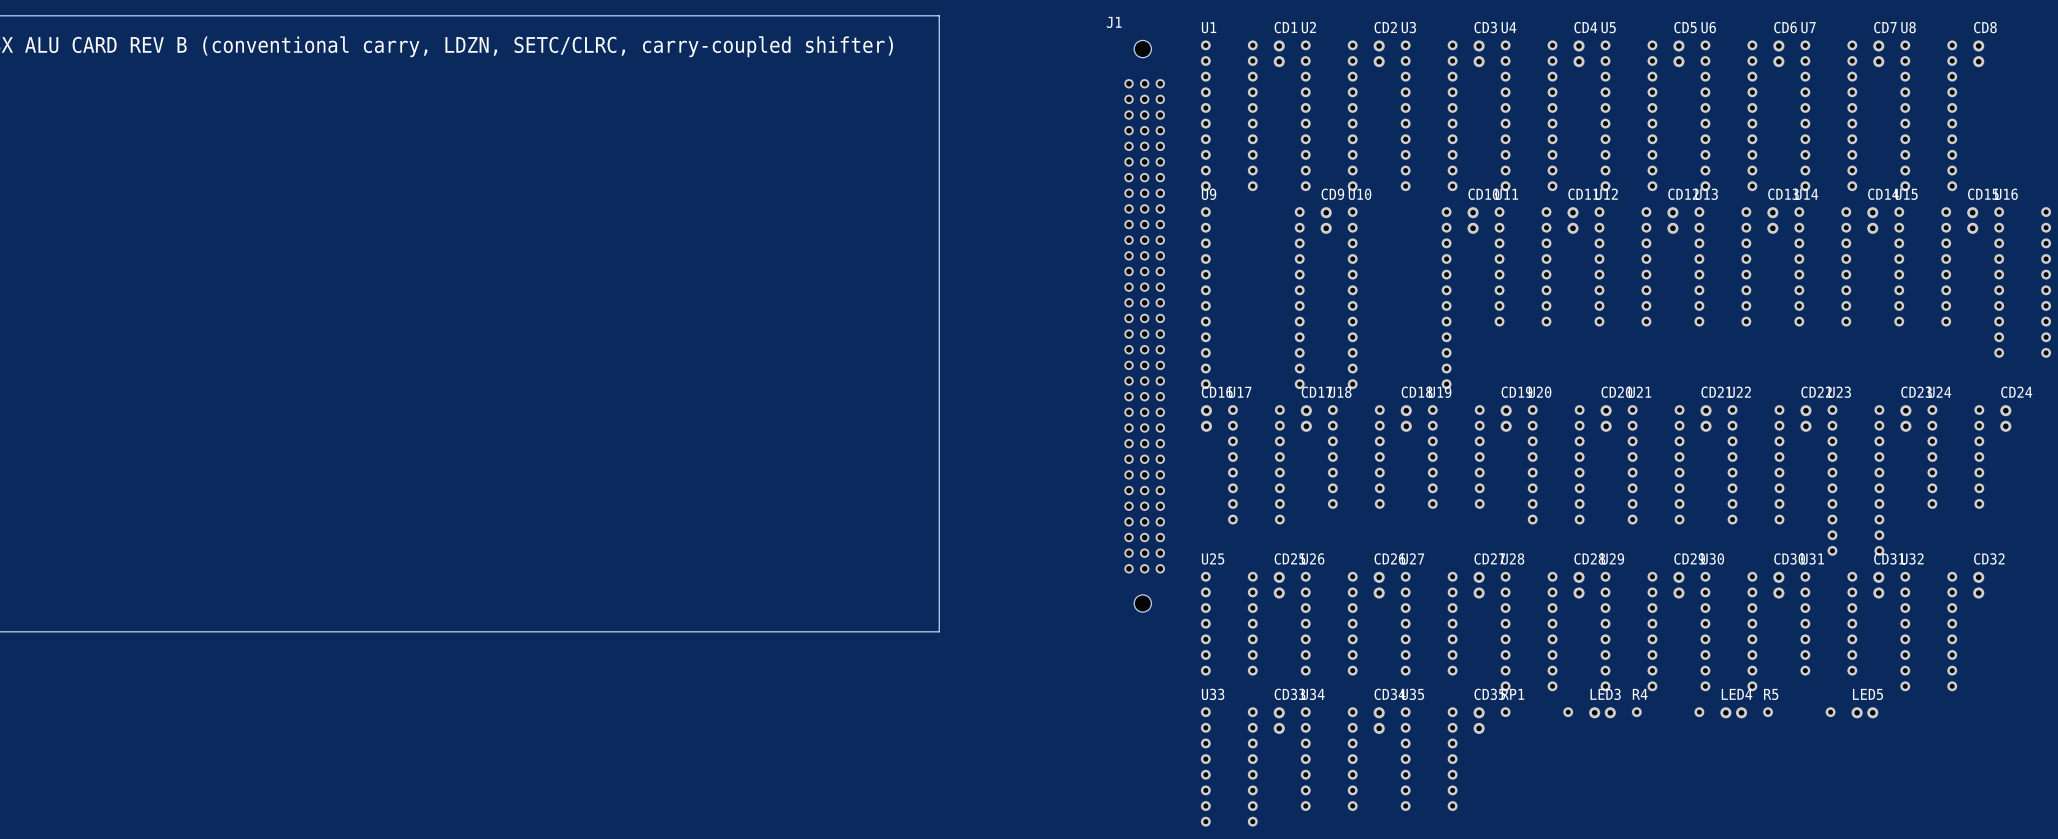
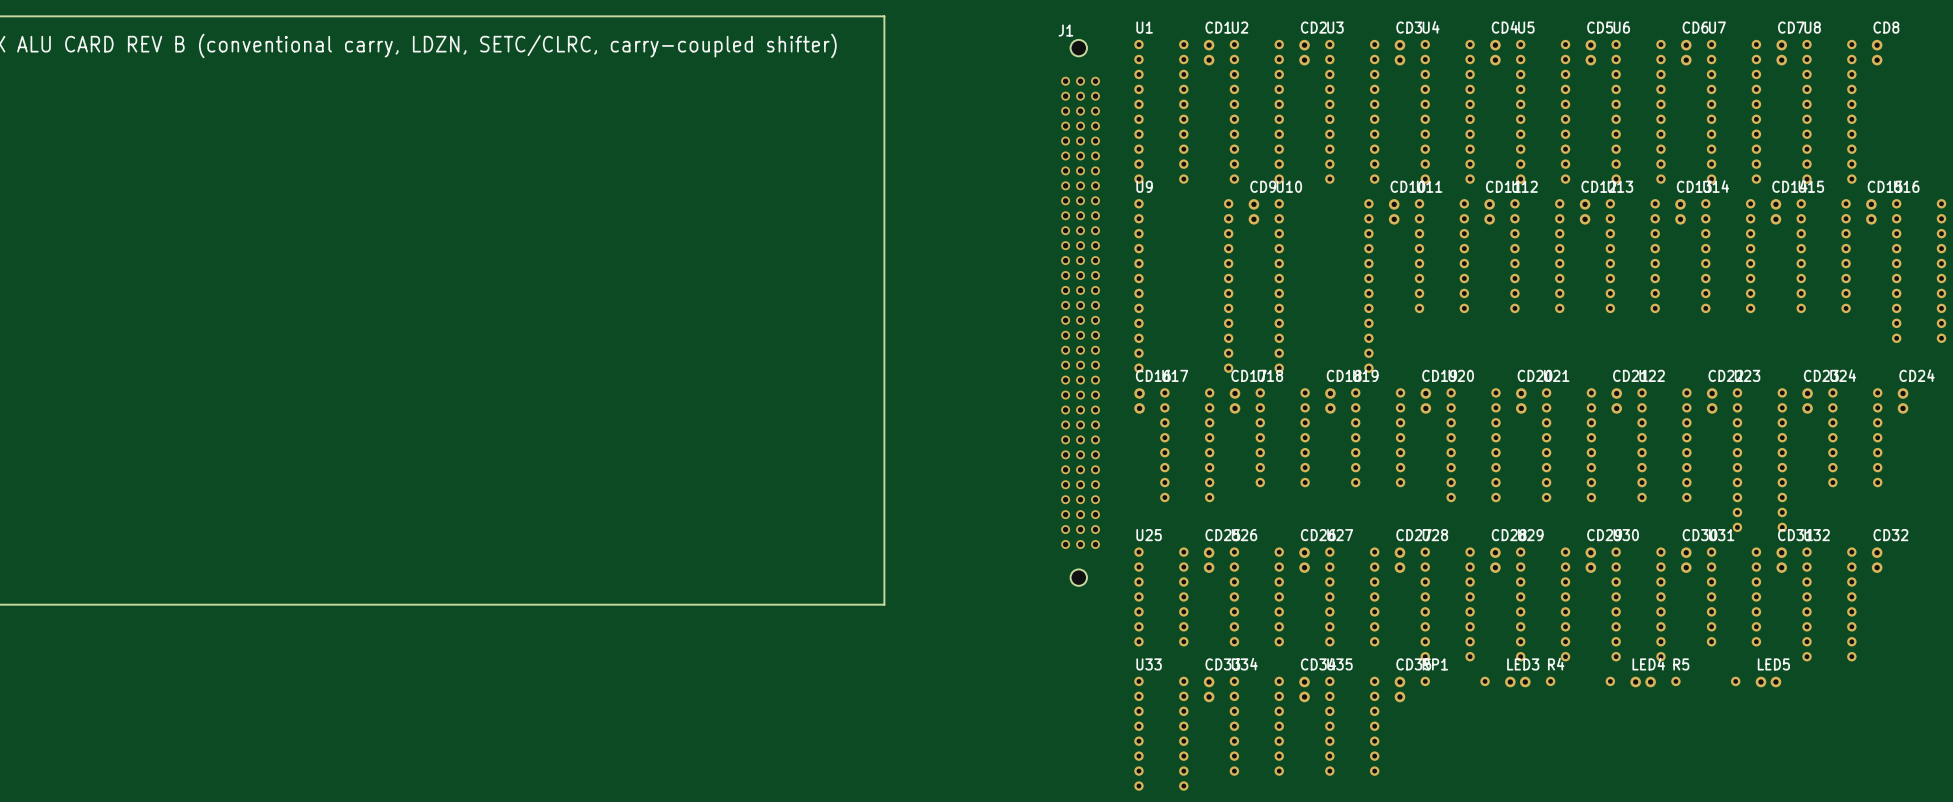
J1 name position: J1 (1114, 22) -> J1 (1065, 30)

